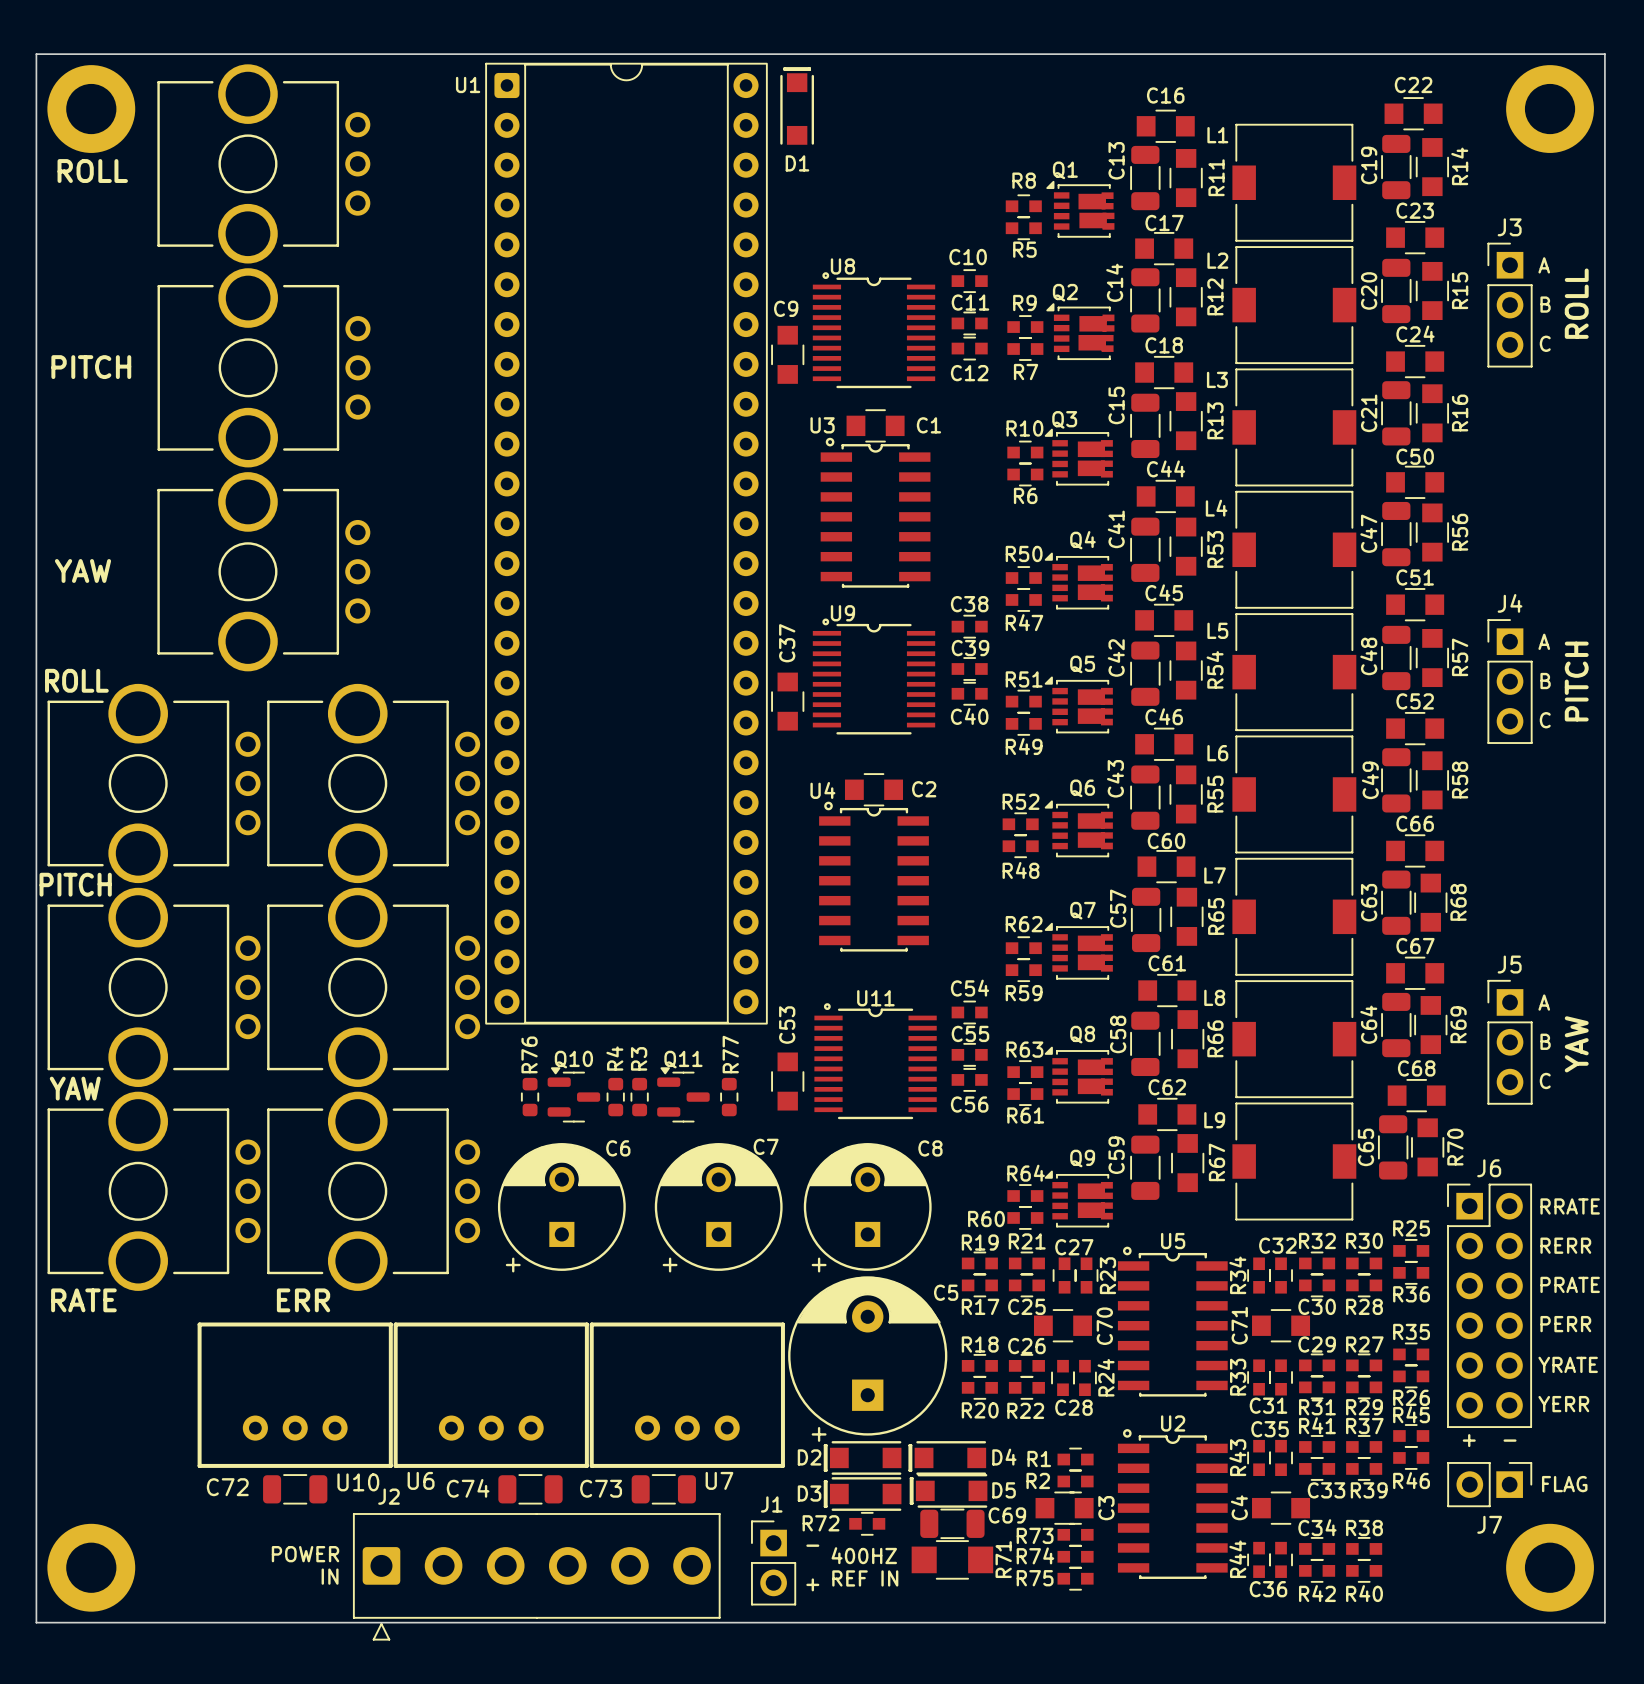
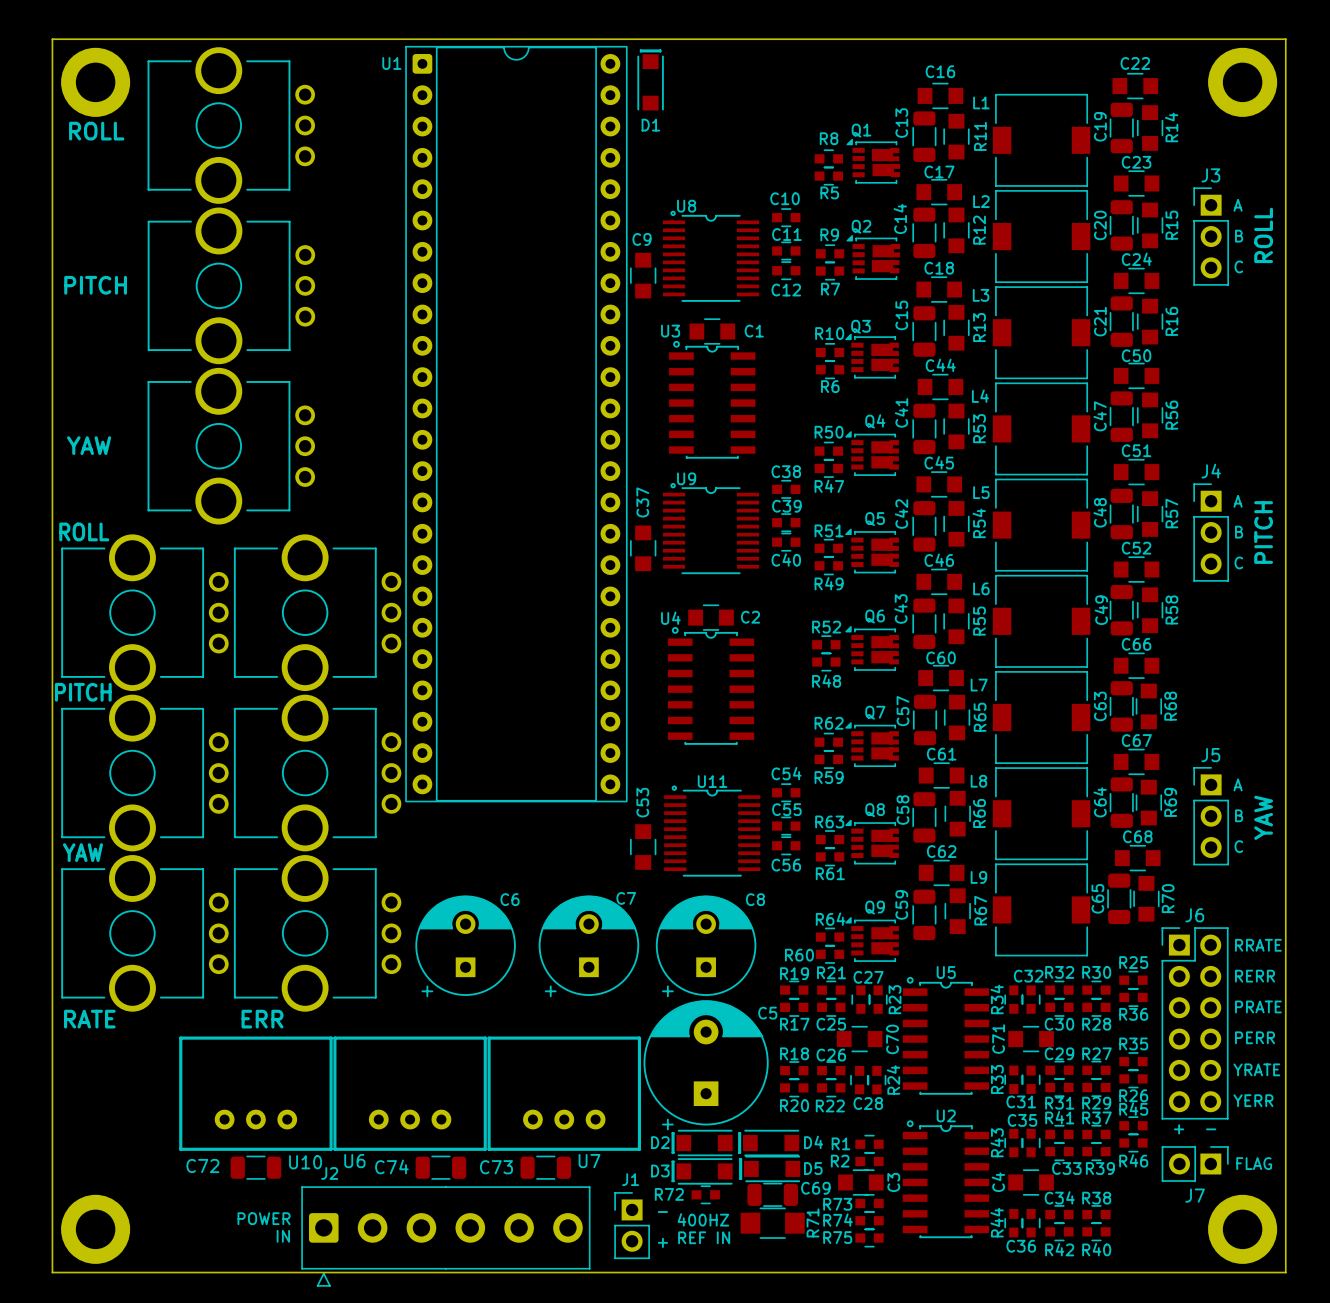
Q10: (573, 1094) -> none
Q11: (683, 1094) -> none
R76: (530, 1097) -> none
R4: (615, 1097) -> none
R3: (639, 1097) -> none
R77: (729, 1097) -> none

